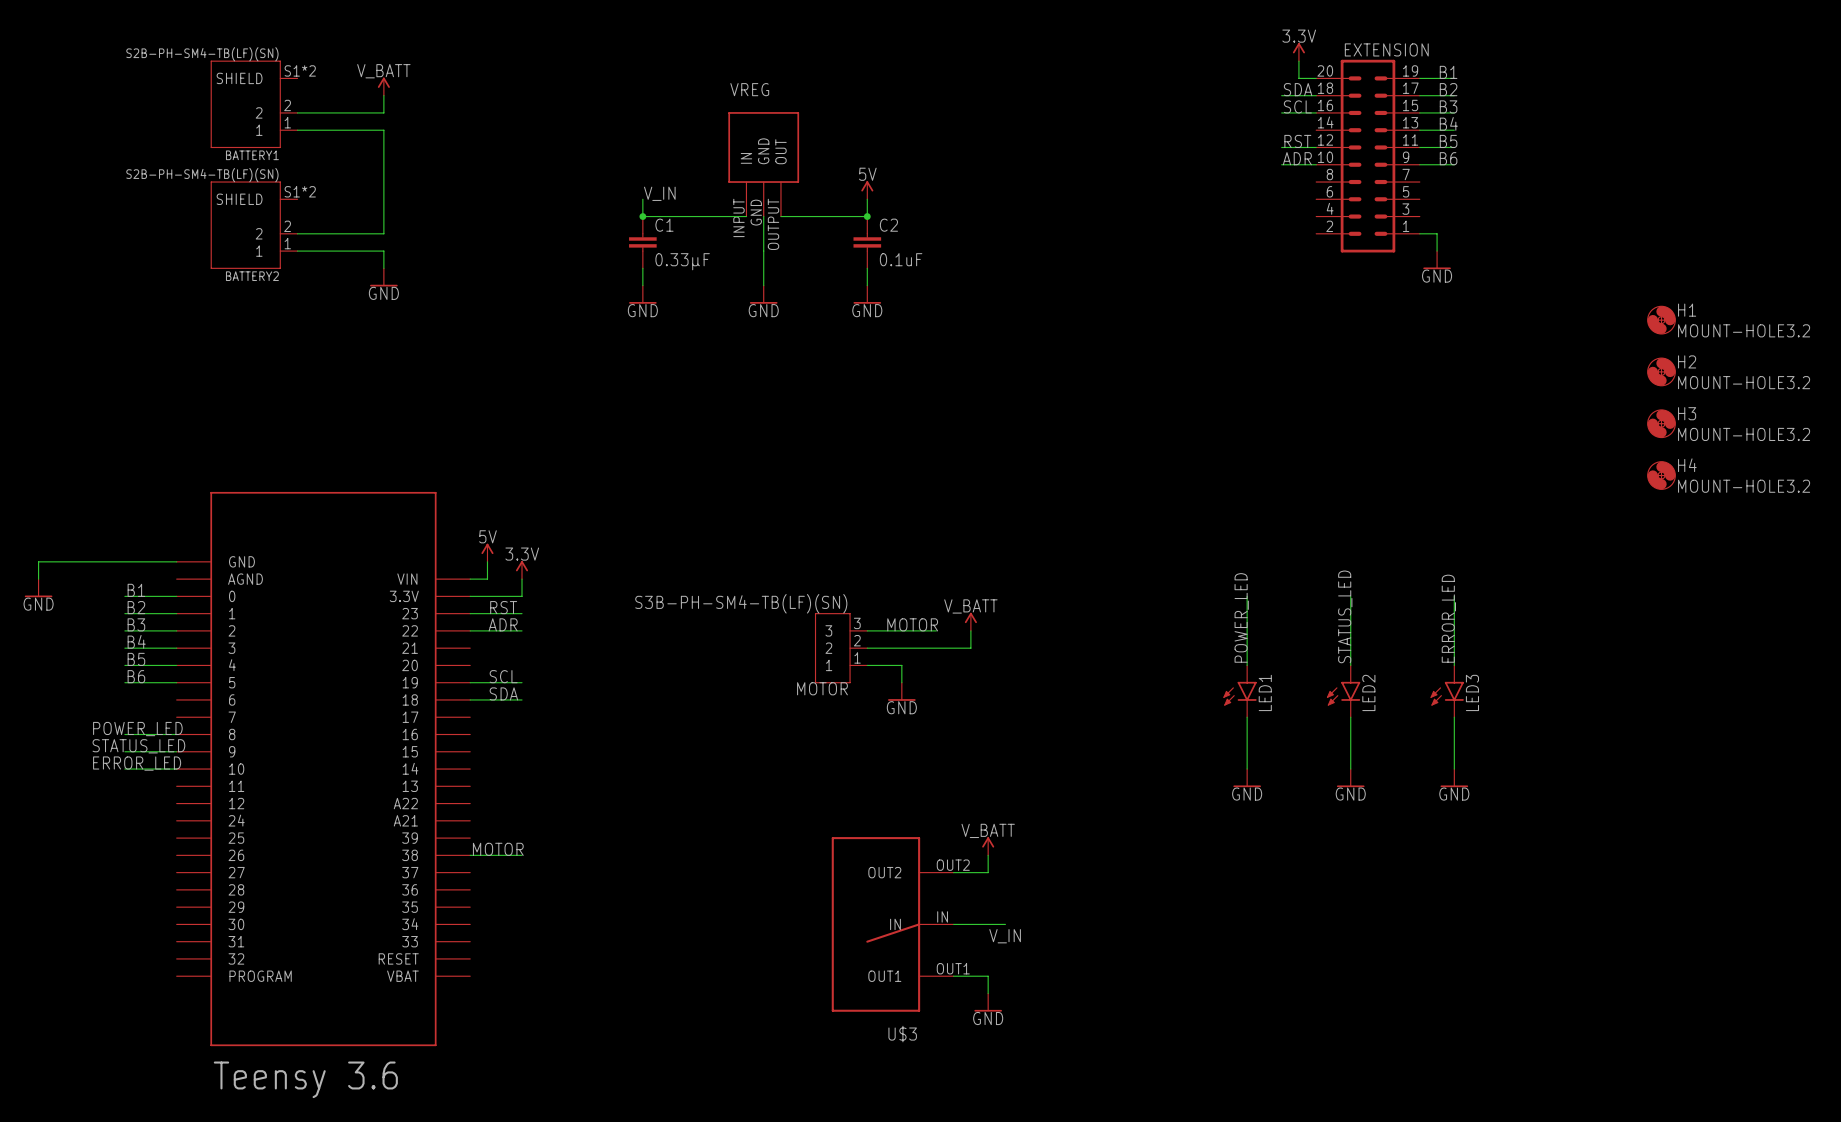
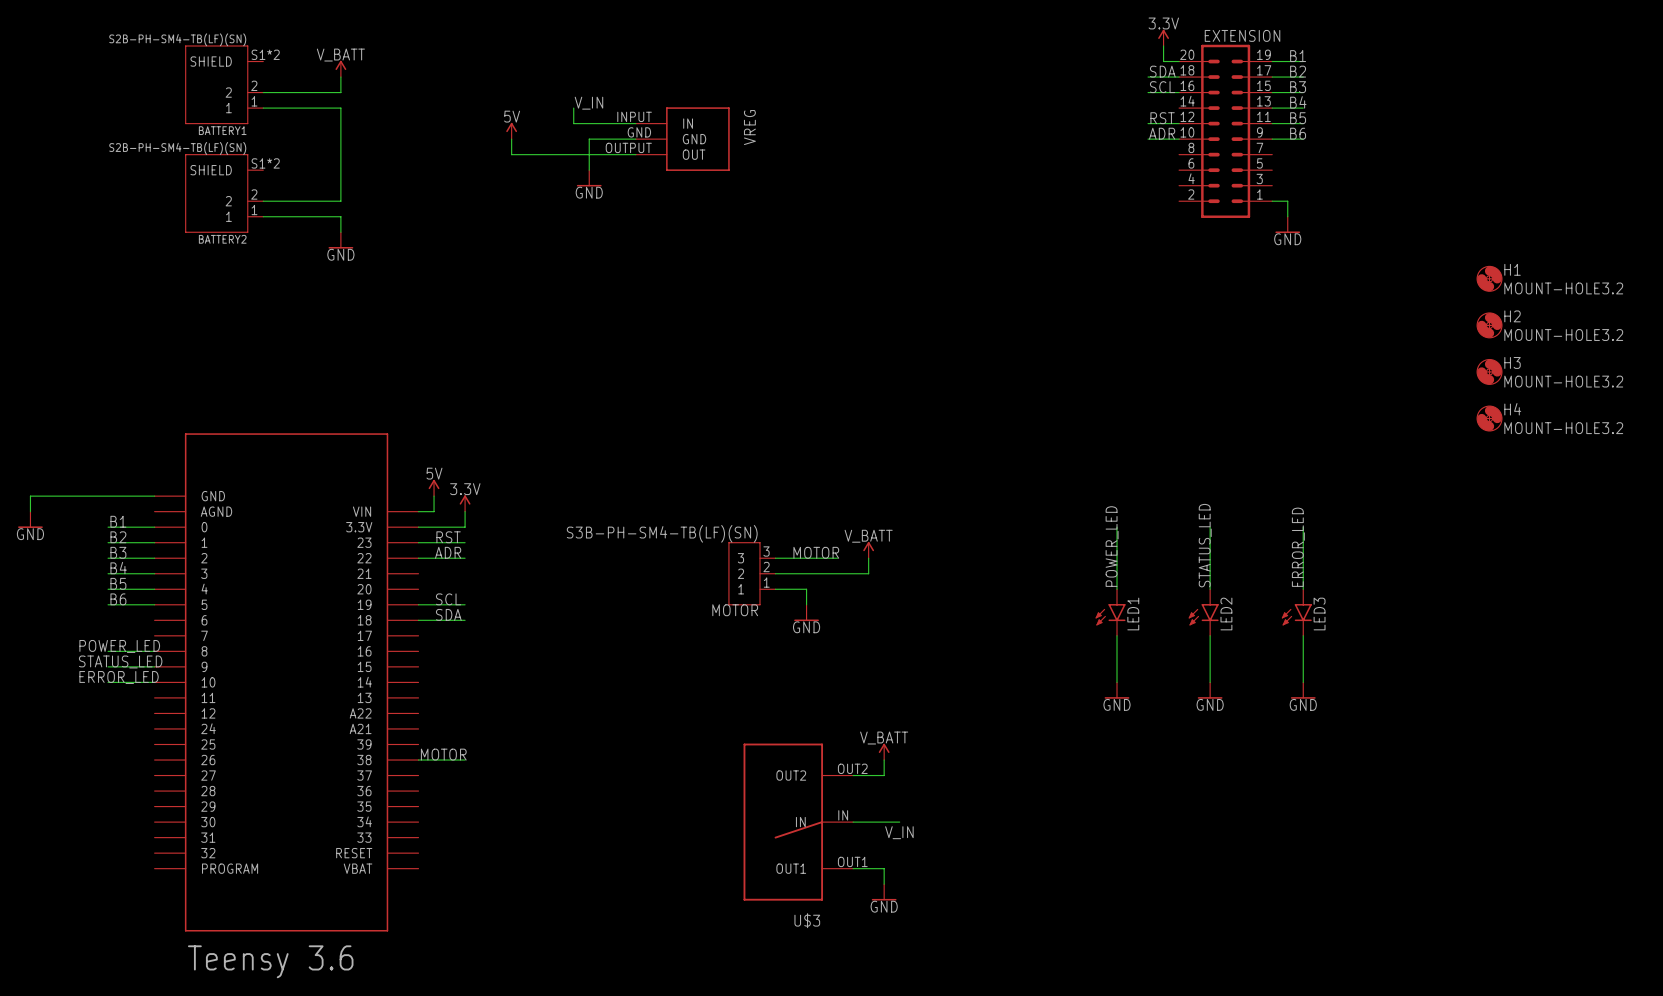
part symbol: [728, 112, 800, 217] -> [635, 107, 730, 171]
wire: none -> (573, 108) (573, 123) (635, 123)
power symbol: none -> 5V (511, 130)
wire: none -> (511, 139) (511, 154) (635, 154)
wire: none -> (635, 139) (589, 139) (589, 170)
power symbol: 5V (867, 190) -> none
label position: V_IN (659, 193) -> V_IN (588, 103)
wire: (642, 199) (642, 216) (746, 216) -> none
wire: (867, 199) (867, 216) (780, 216) -> none
power symbol: none -> GND (589, 178)
junction: (642, 216) -> none
wire: (763, 216) (763, 285) -> none
junction: (867, 216) -> none
C1: 0.33µF (642, 242) -> none
C2: 0.1uF (867, 242) -> none
wire: (642, 268) (642, 285) -> none
wire: (867, 268) (867, 285) -> none
power symbol: GND (642, 294) -> none
power symbol: GND (763, 294) -> none
power symbol: GND (867, 294) -> none

